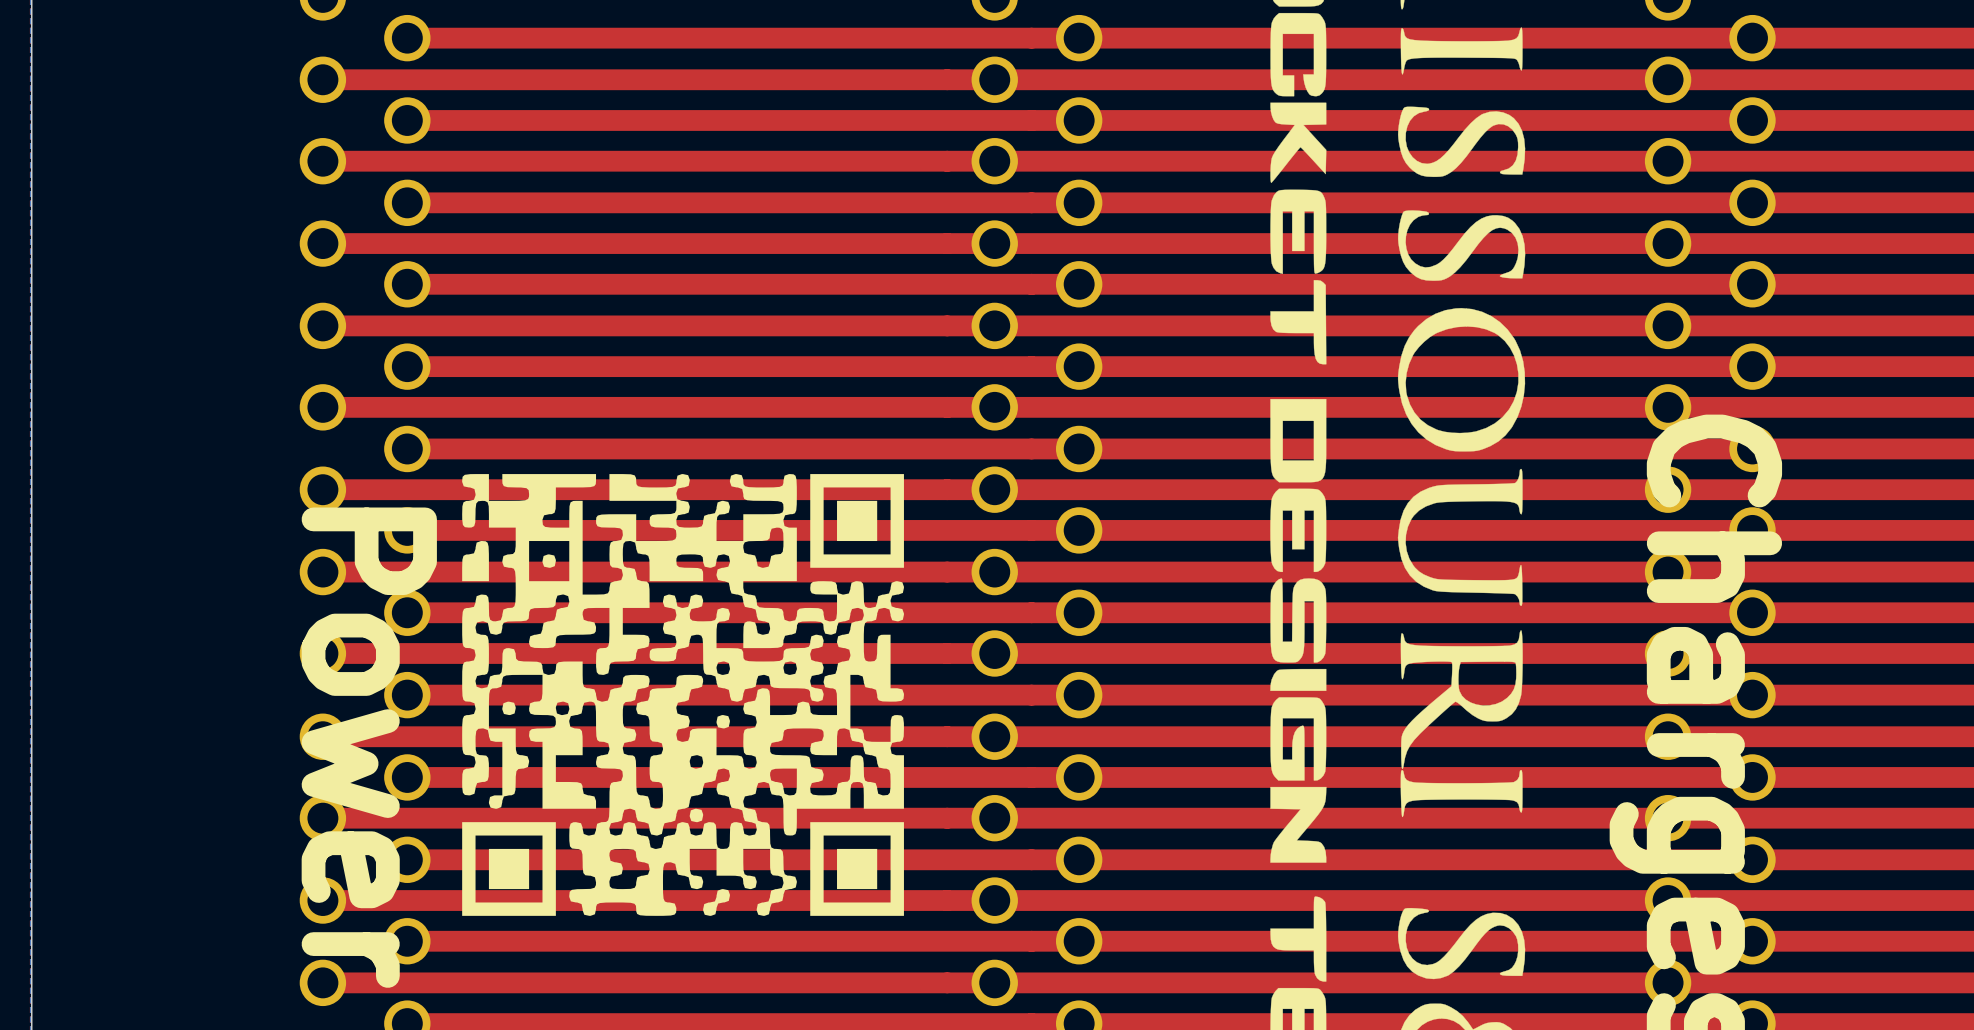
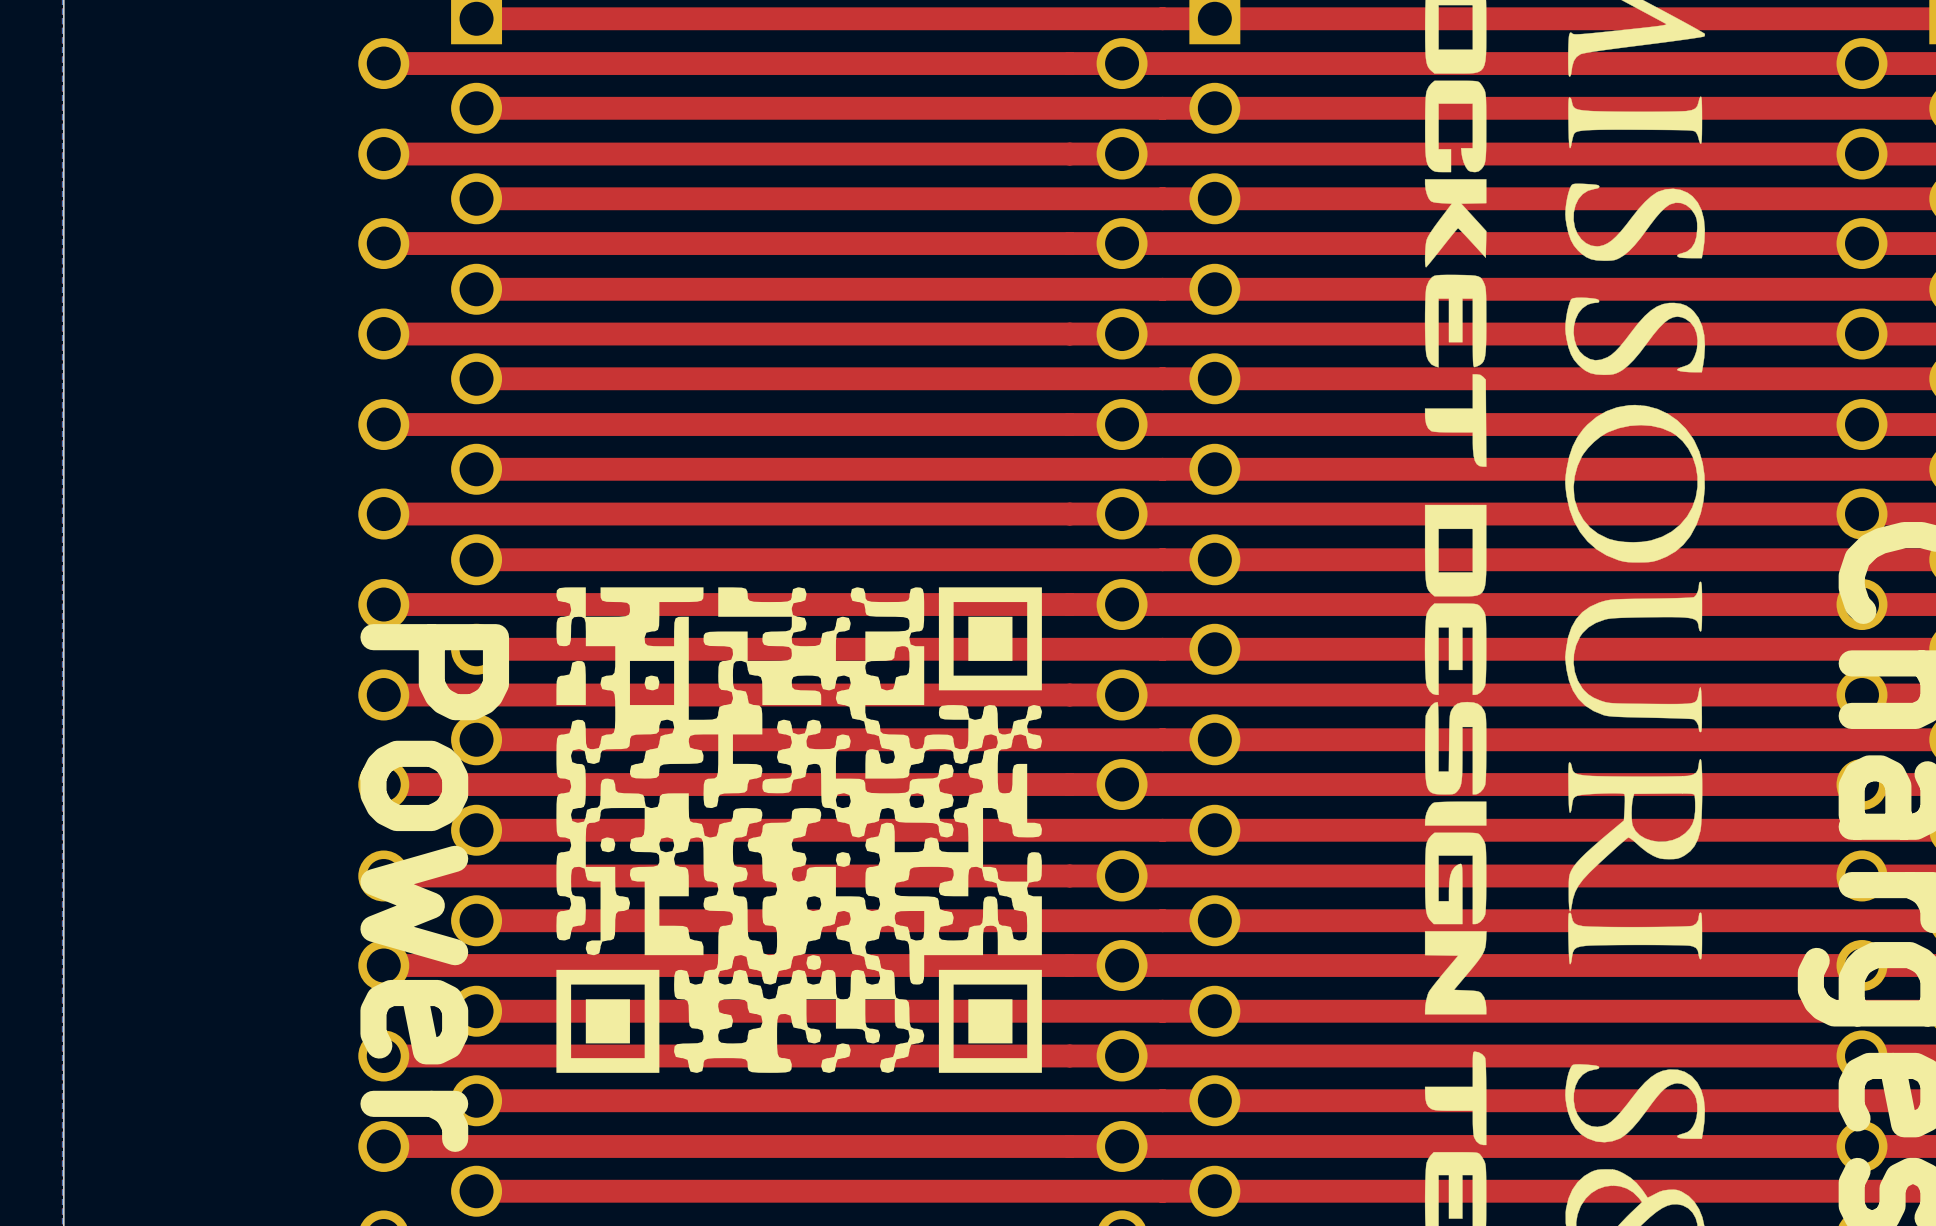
drawing position: (683, 694) -> (799, 830)

